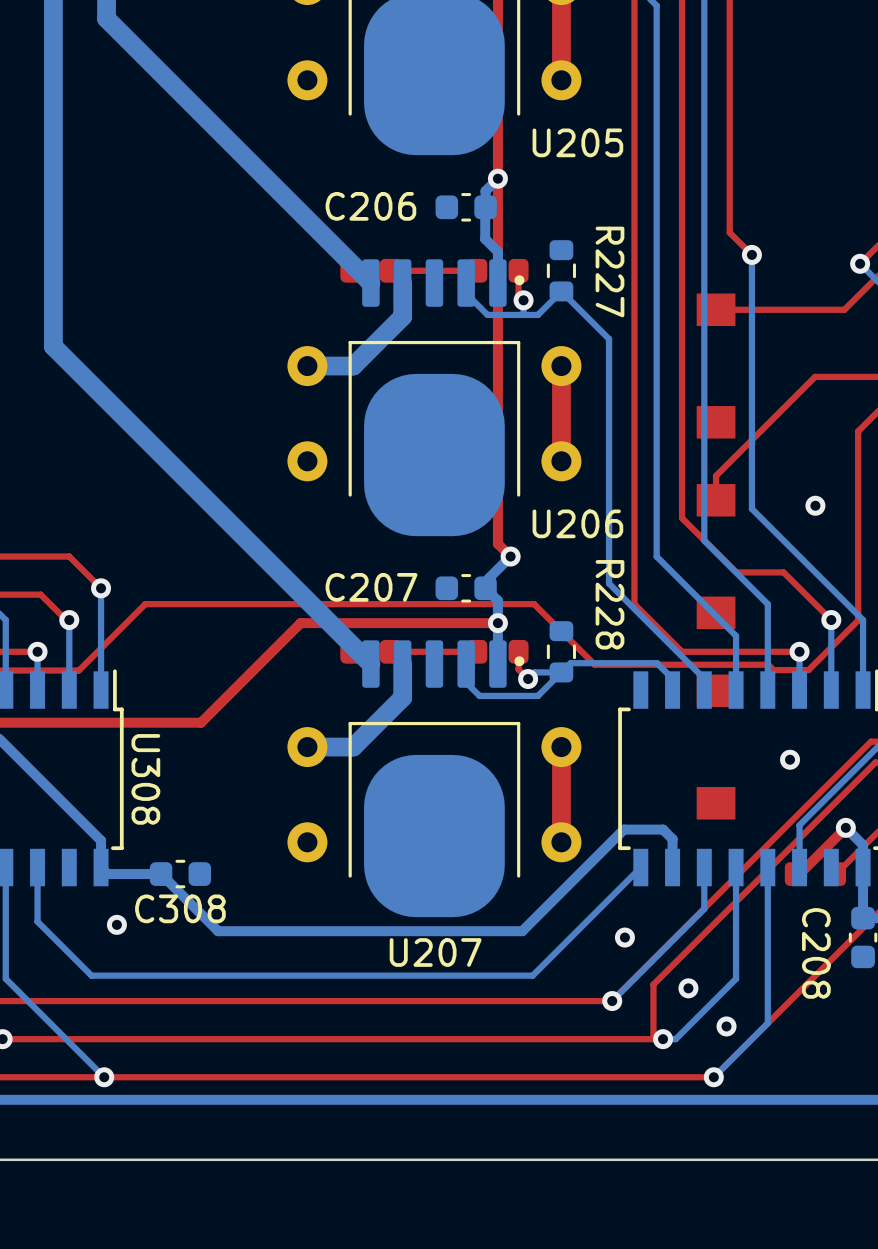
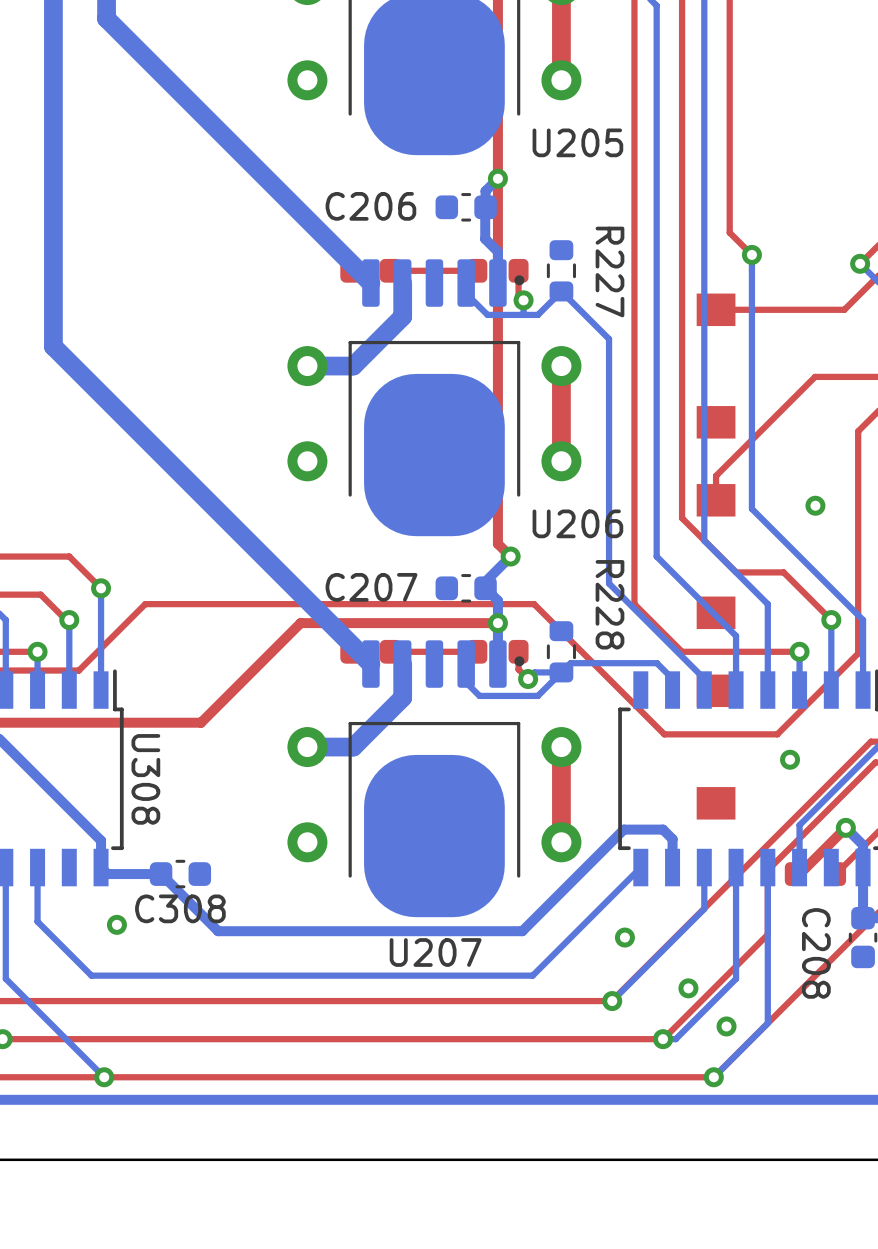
top track: (858, 620) (808, 670) (773, 670) (768, 664) (594, 664) -> (858, 620) (858, 653) (777, 734) (664, 734) (594, 664)
top track: (767, 870) (653, 984) (653, 1039) -> (767, 870) (767, 934) (663, 1039)

